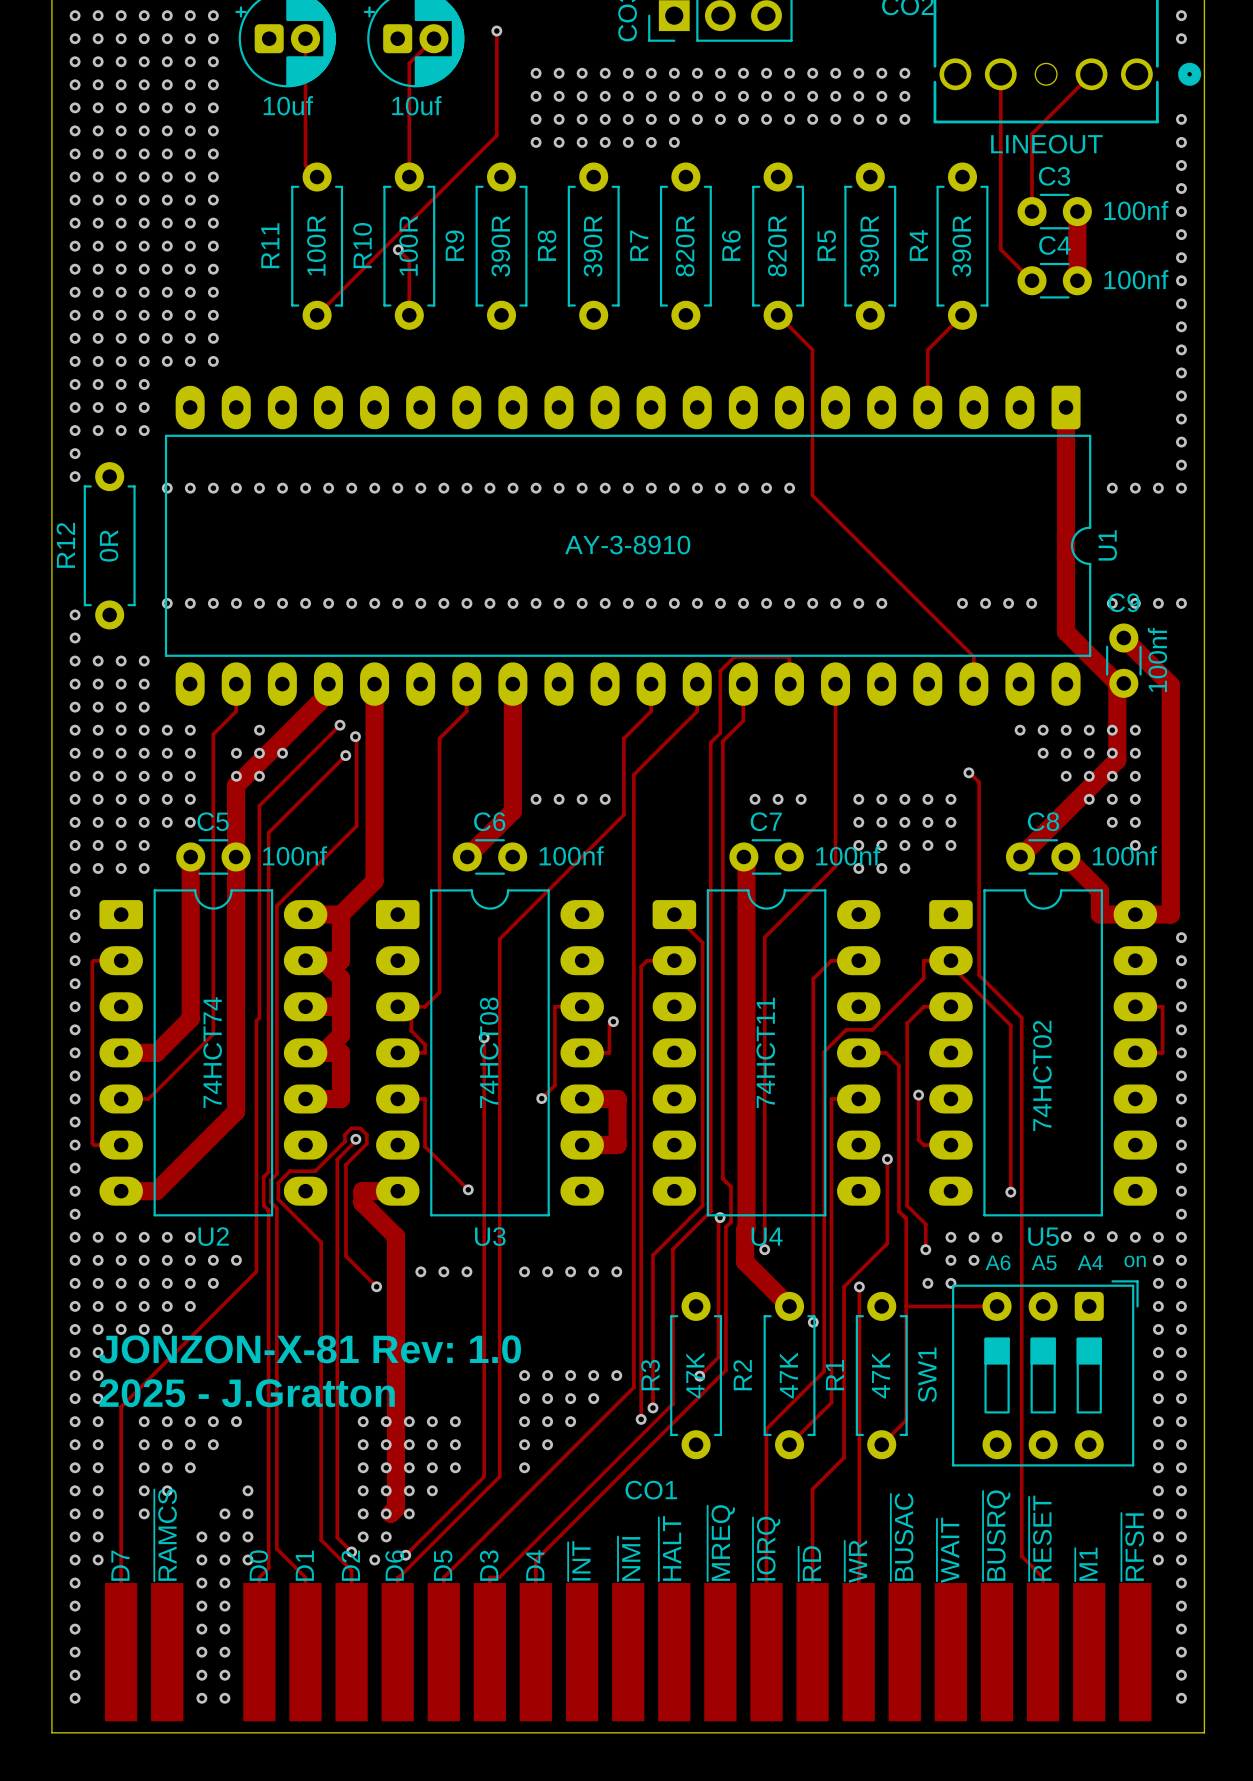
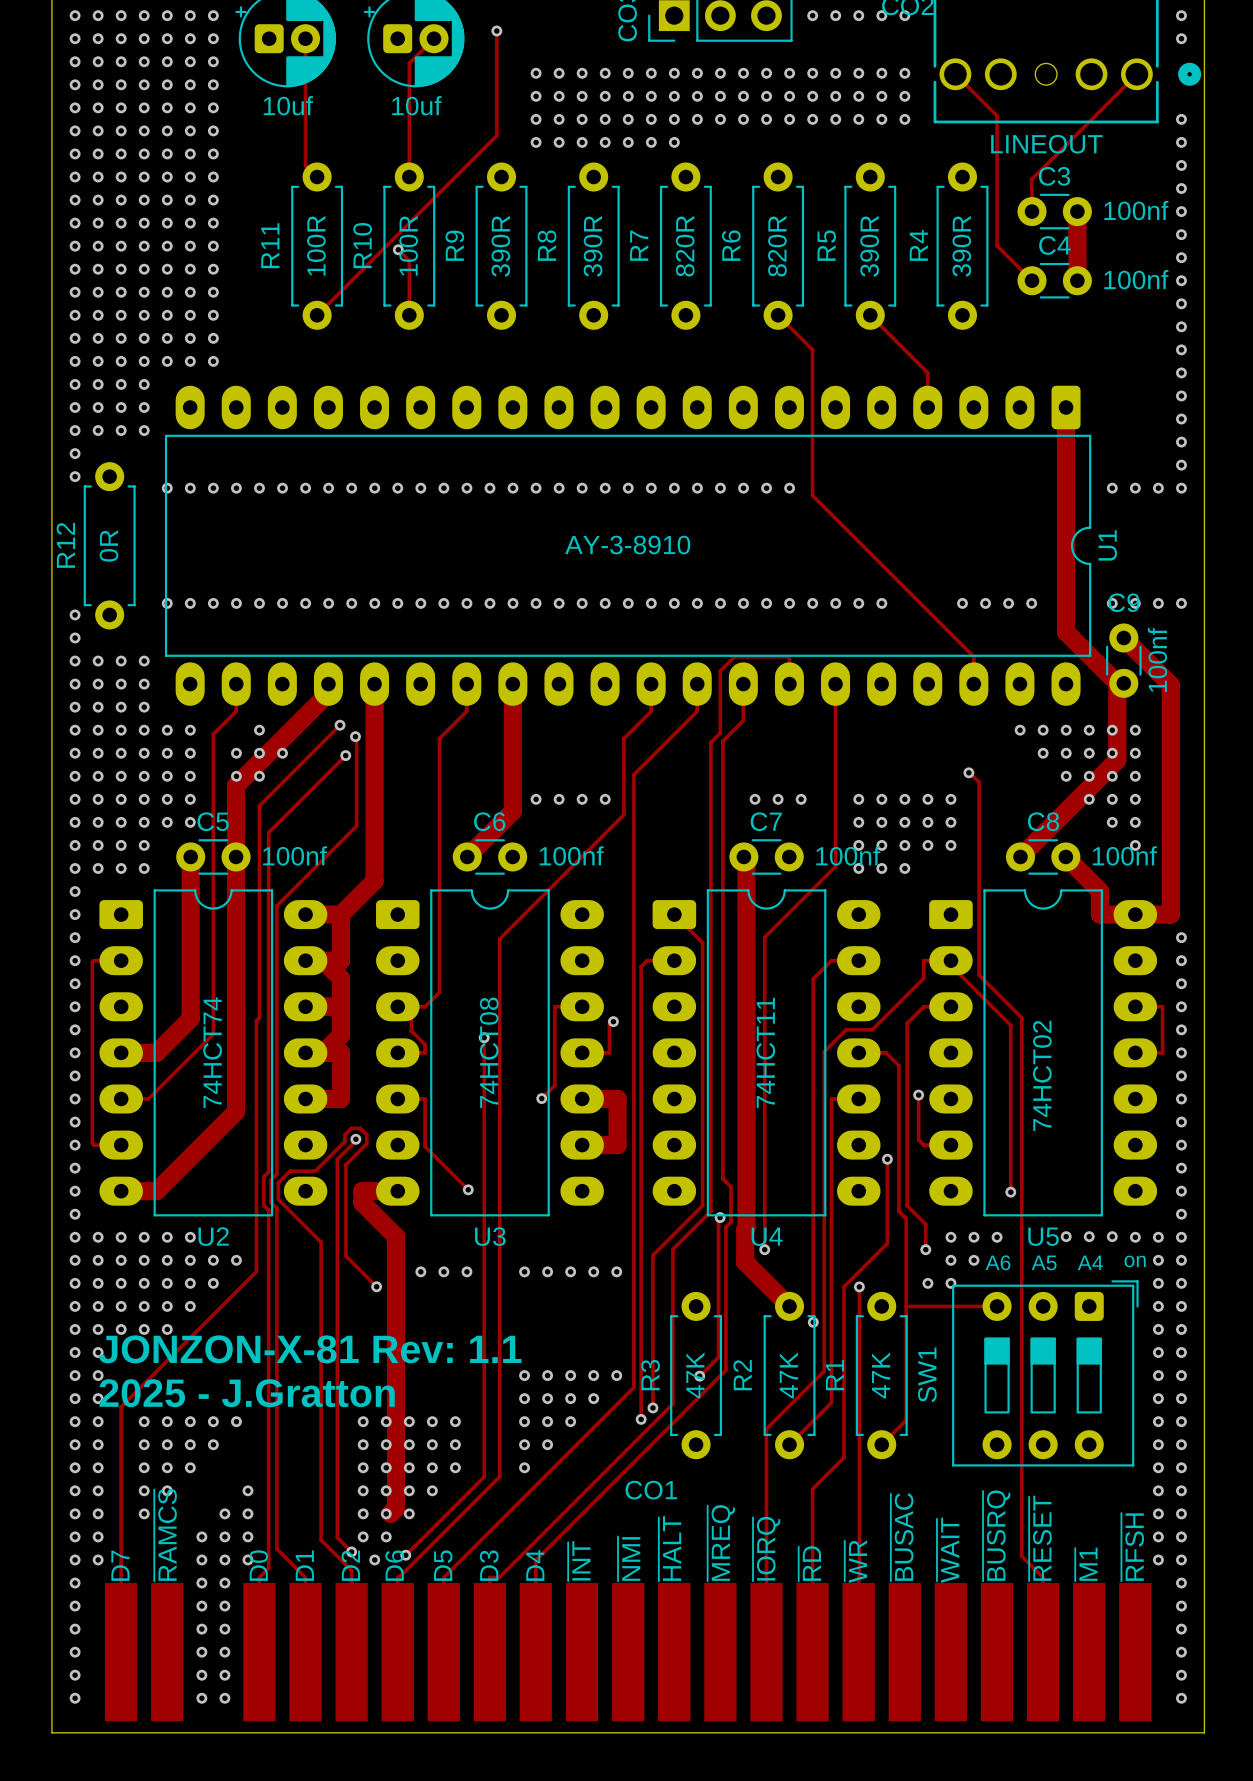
via: none -> (812, 15)
via: none -> (835, 15)
via: none -> (858, 15)
via: none -> (881, 15)
via: none -> (904, 15)
track: (1000, 74) (1000, 249) -> (955, 74) (997, 115) (997, 245) (1000, 249)
track: (1091, 74) (1032, 133) (1032, 188) -> (1136, 74) (1031, 179) (1032, 188)
track: (962, 315) (927, 350) (927, 372) -> (870, 315) (927, 372)
text: JONZON-X-81 Rev: 1.0 (309, 1349) -> JONZON-X-81 Rev: 1.1 (310, 1349)

